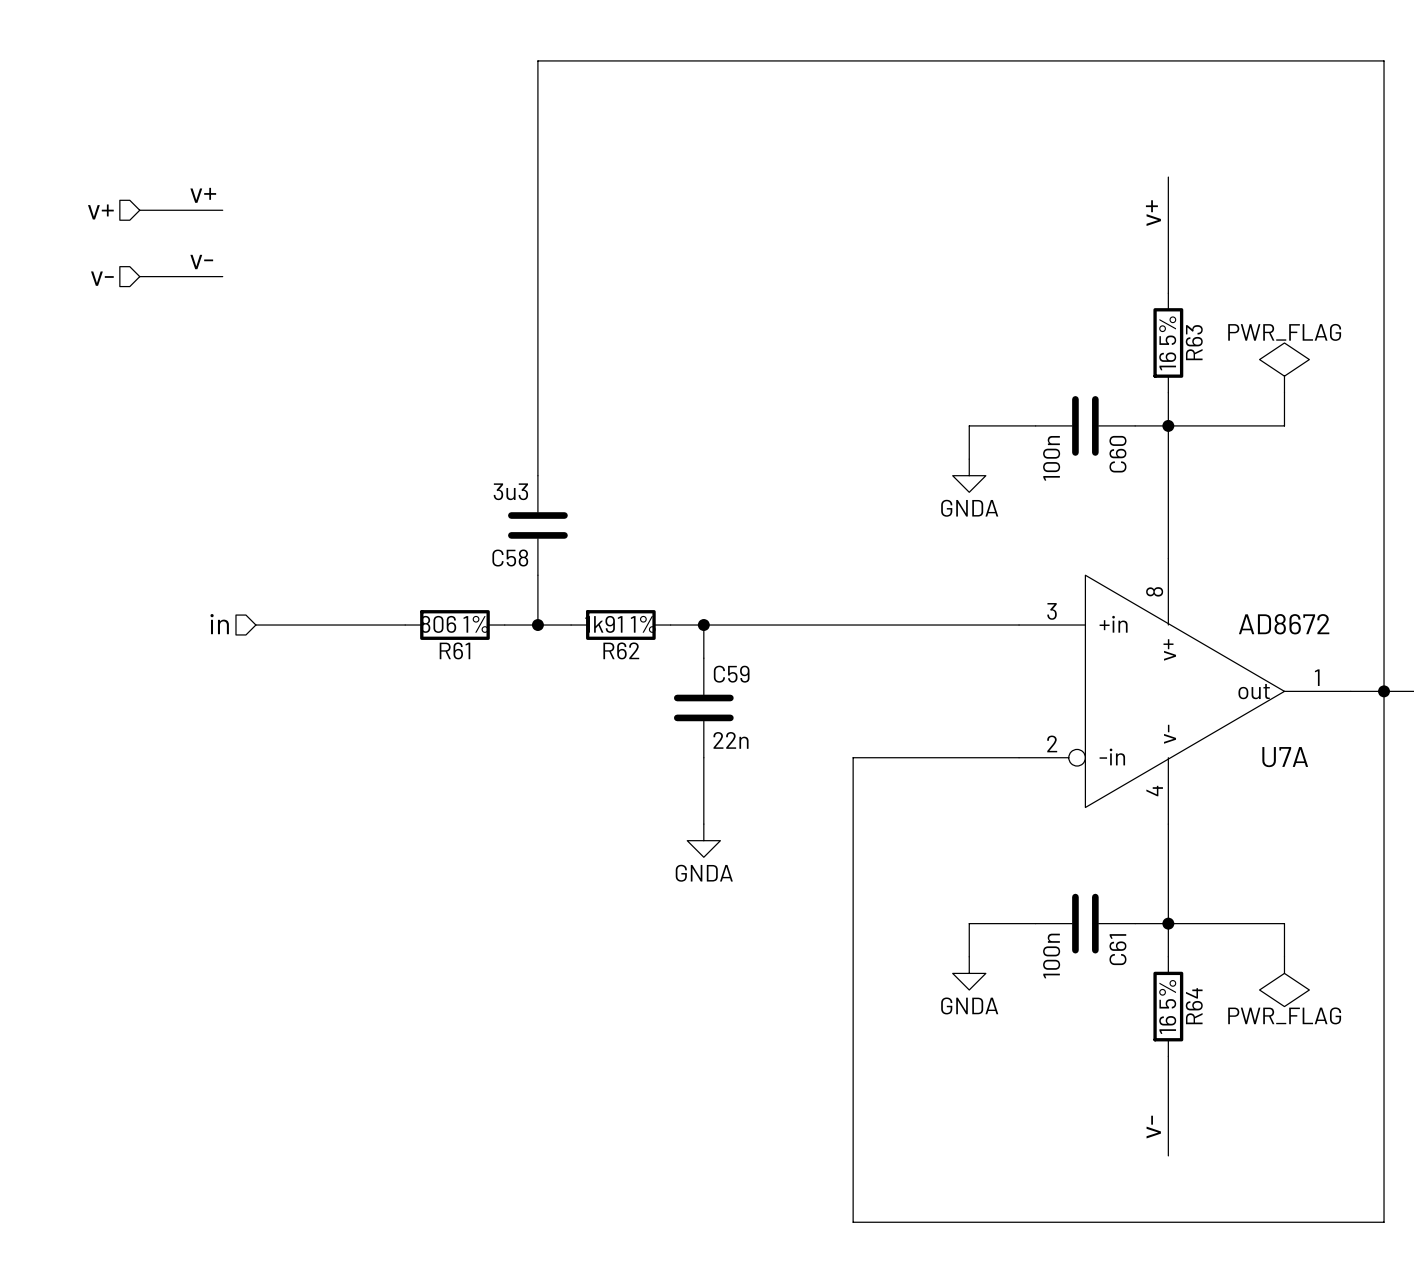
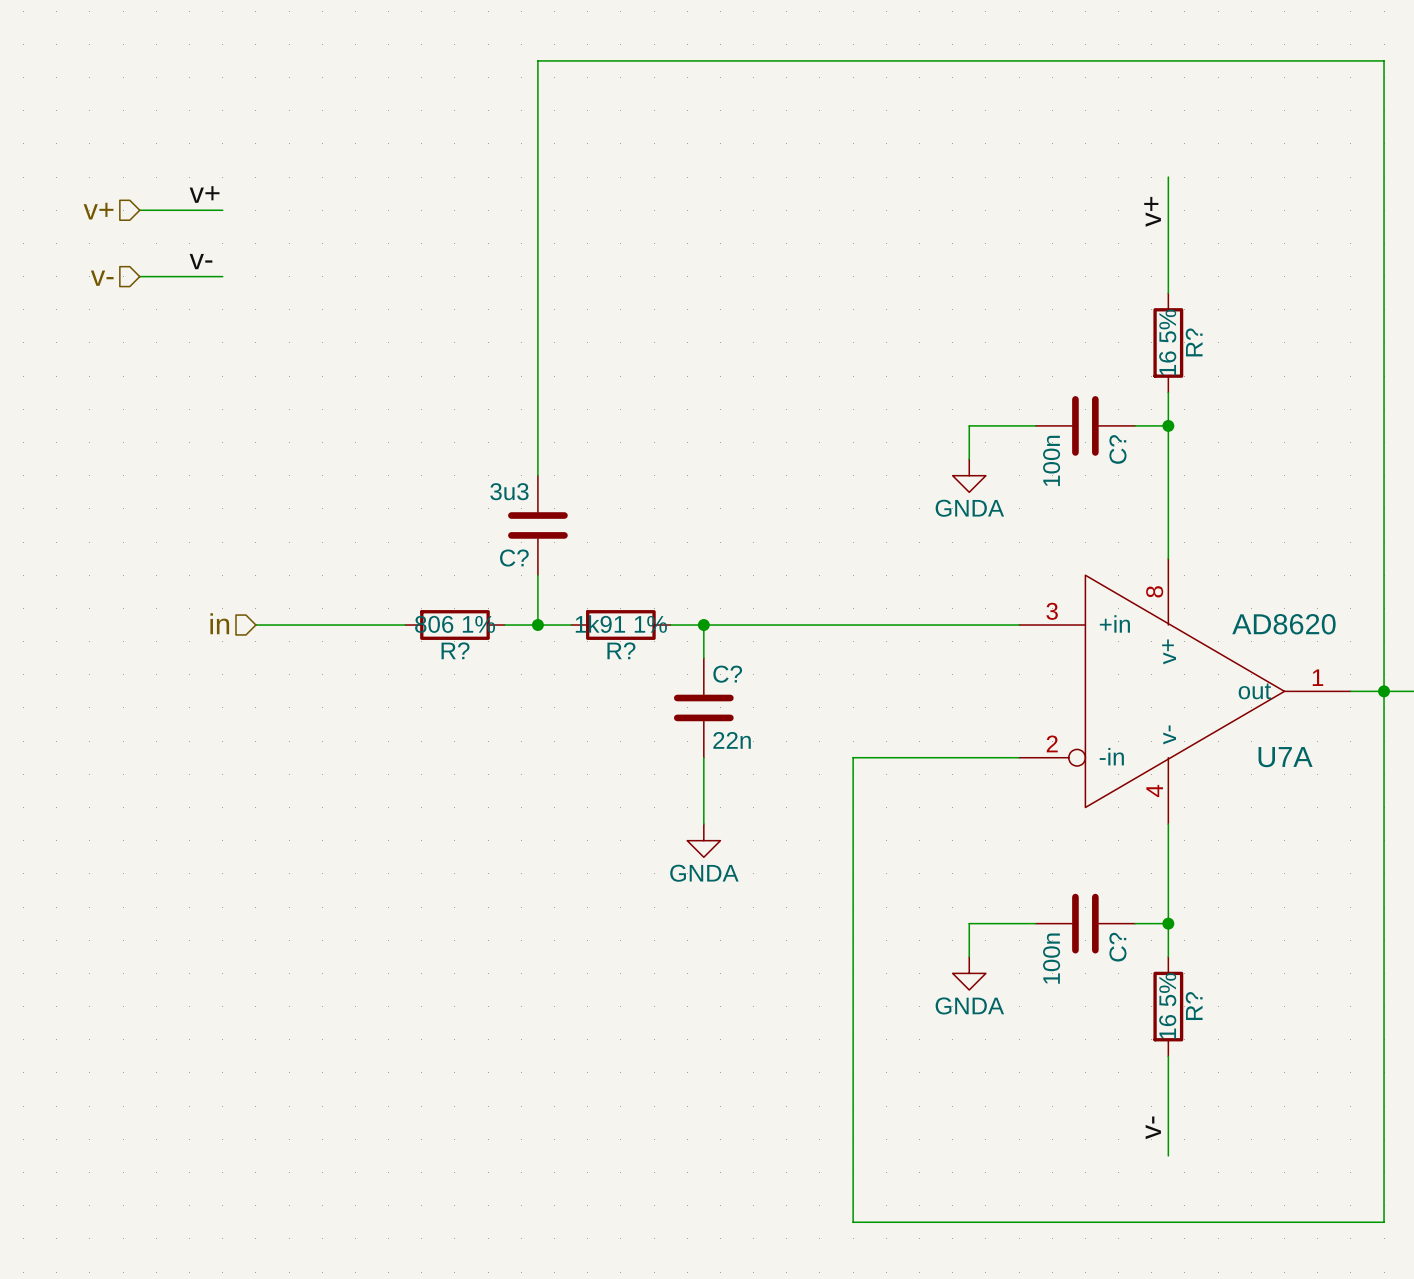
R63 name: R63 (1194, 342) -> R? (1194, 342)
power symbol: PWR_FLAG (1284, 367) -> none
wire: (1284, 392) (1284, 425) (1168, 425) -> none
C60 name: C60 (1117, 454) -> C? (1117, 449)
C58 name: C58 (510, 558) -> C? (514, 558)
U7A value: AD8672 (1284, 624) -> AD8620 (1283, 624)
R61 name: R61 (454, 650) -> R? (455, 650)
R62 name: R62 (621, 650) -> R? (621, 650)
C59 name: C59 (731, 674) -> C? (727, 674)
wire: (1168, 923) (1284, 923) (1284, 956) -> none
C61 name: C61 (1117, 949) -> C? (1117, 947)
power symbol: PWR_FLAG (1284, 981) -> none
R64 name: R64 (1194, 1006) -> R? (1194, 1006)

